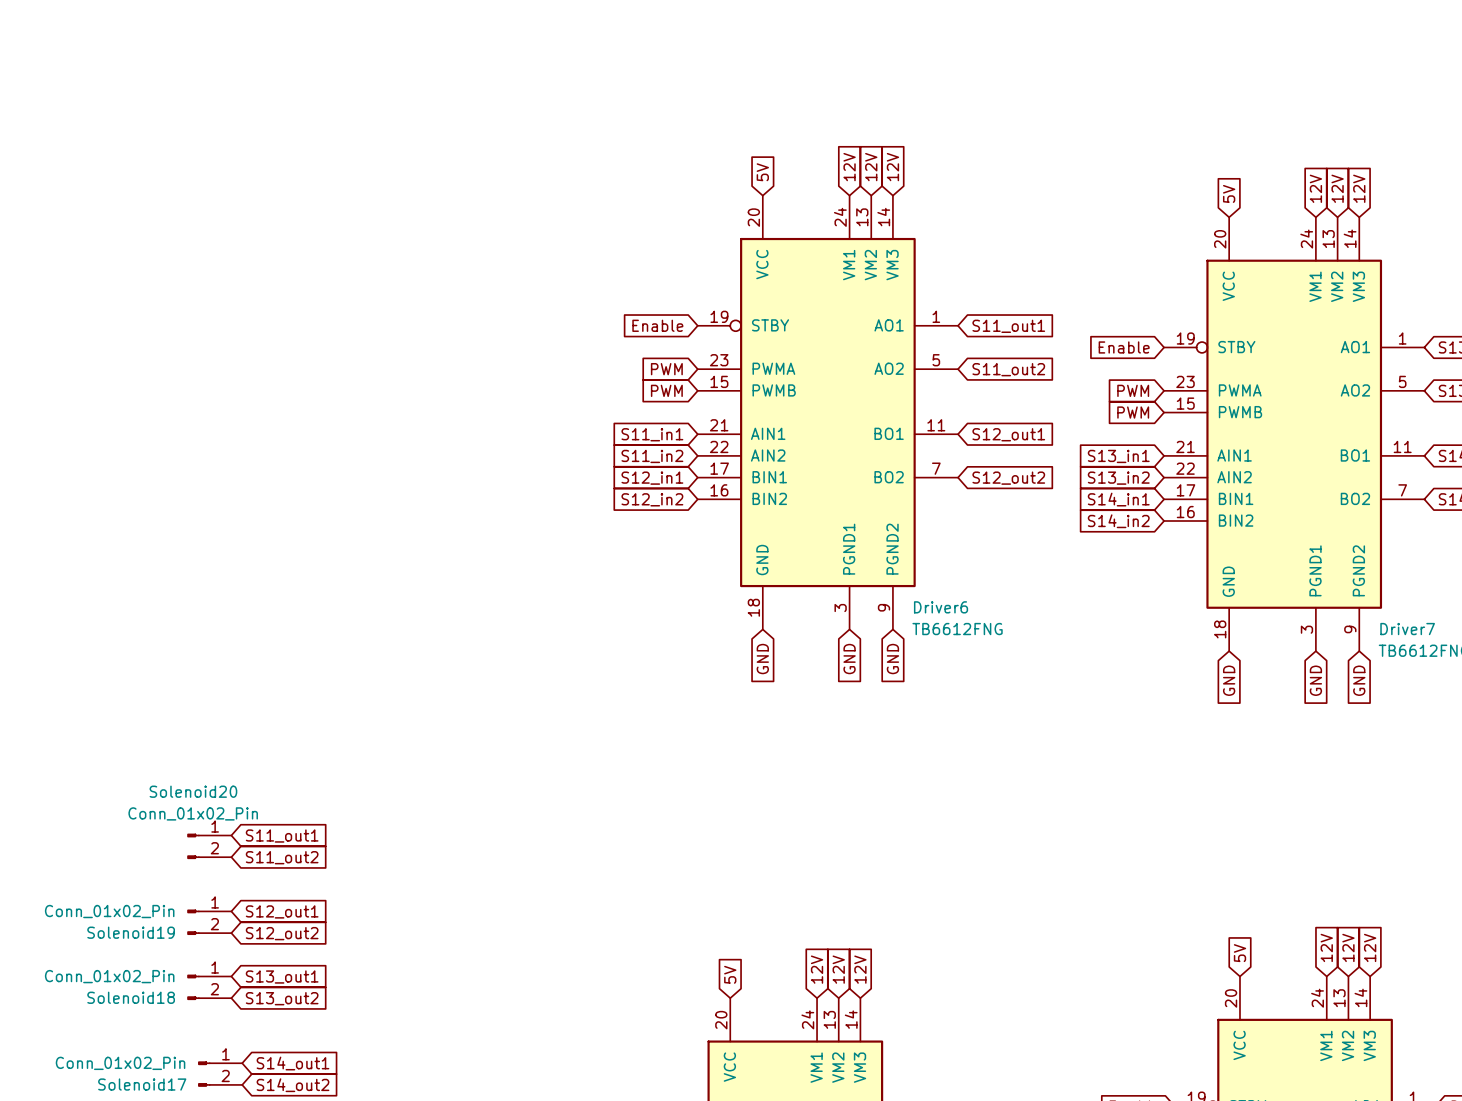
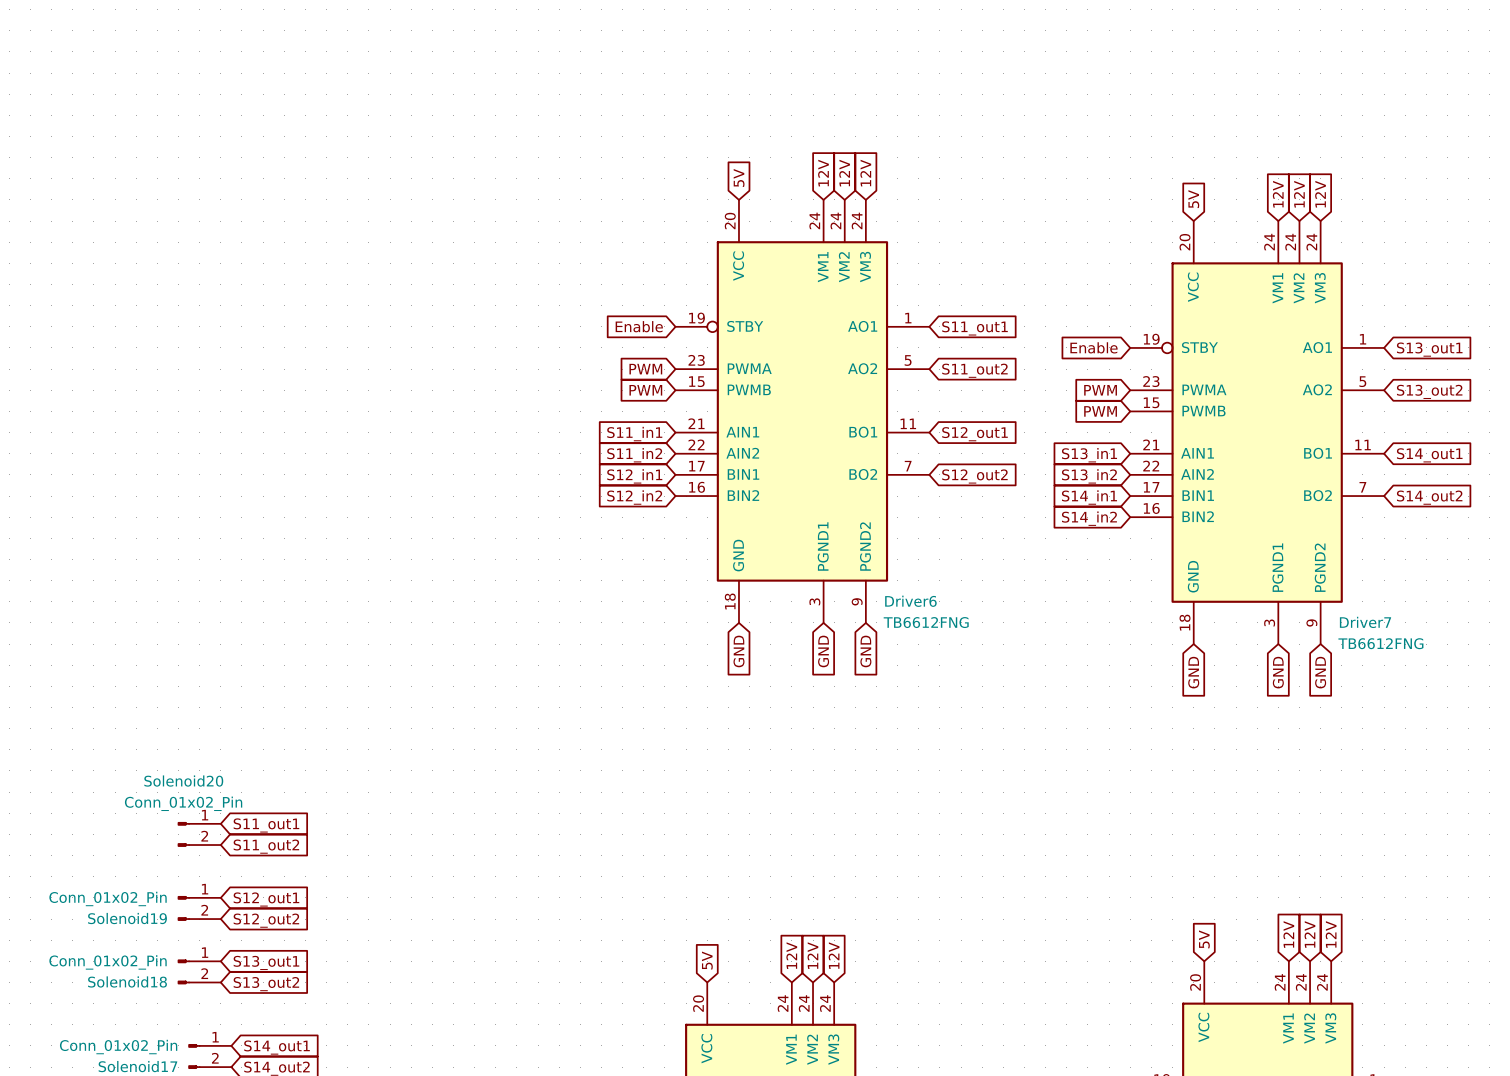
Driver6 pin number: 13 (862, 217) -> 24 (835, 220)
Driver6 pin number: 14 (883, 217) -> 24 (857, 220)
Driver7 pin number: 14 (1350, 238) -> 24 (1311, 242)
Driver7 pin number: 13 (1328, 239) -> 24 (1290, 242)
part pin number: 14 (1360, 997) -> 24 (1322, 982)
part pin number: 13 (1339, 998) -> 24 (1301, 982)
part pin number: 13 (829, 1019) -> 24 (804, 1003)
part pin number: 14 (851, 1019) -> 24 (825, 1003)

